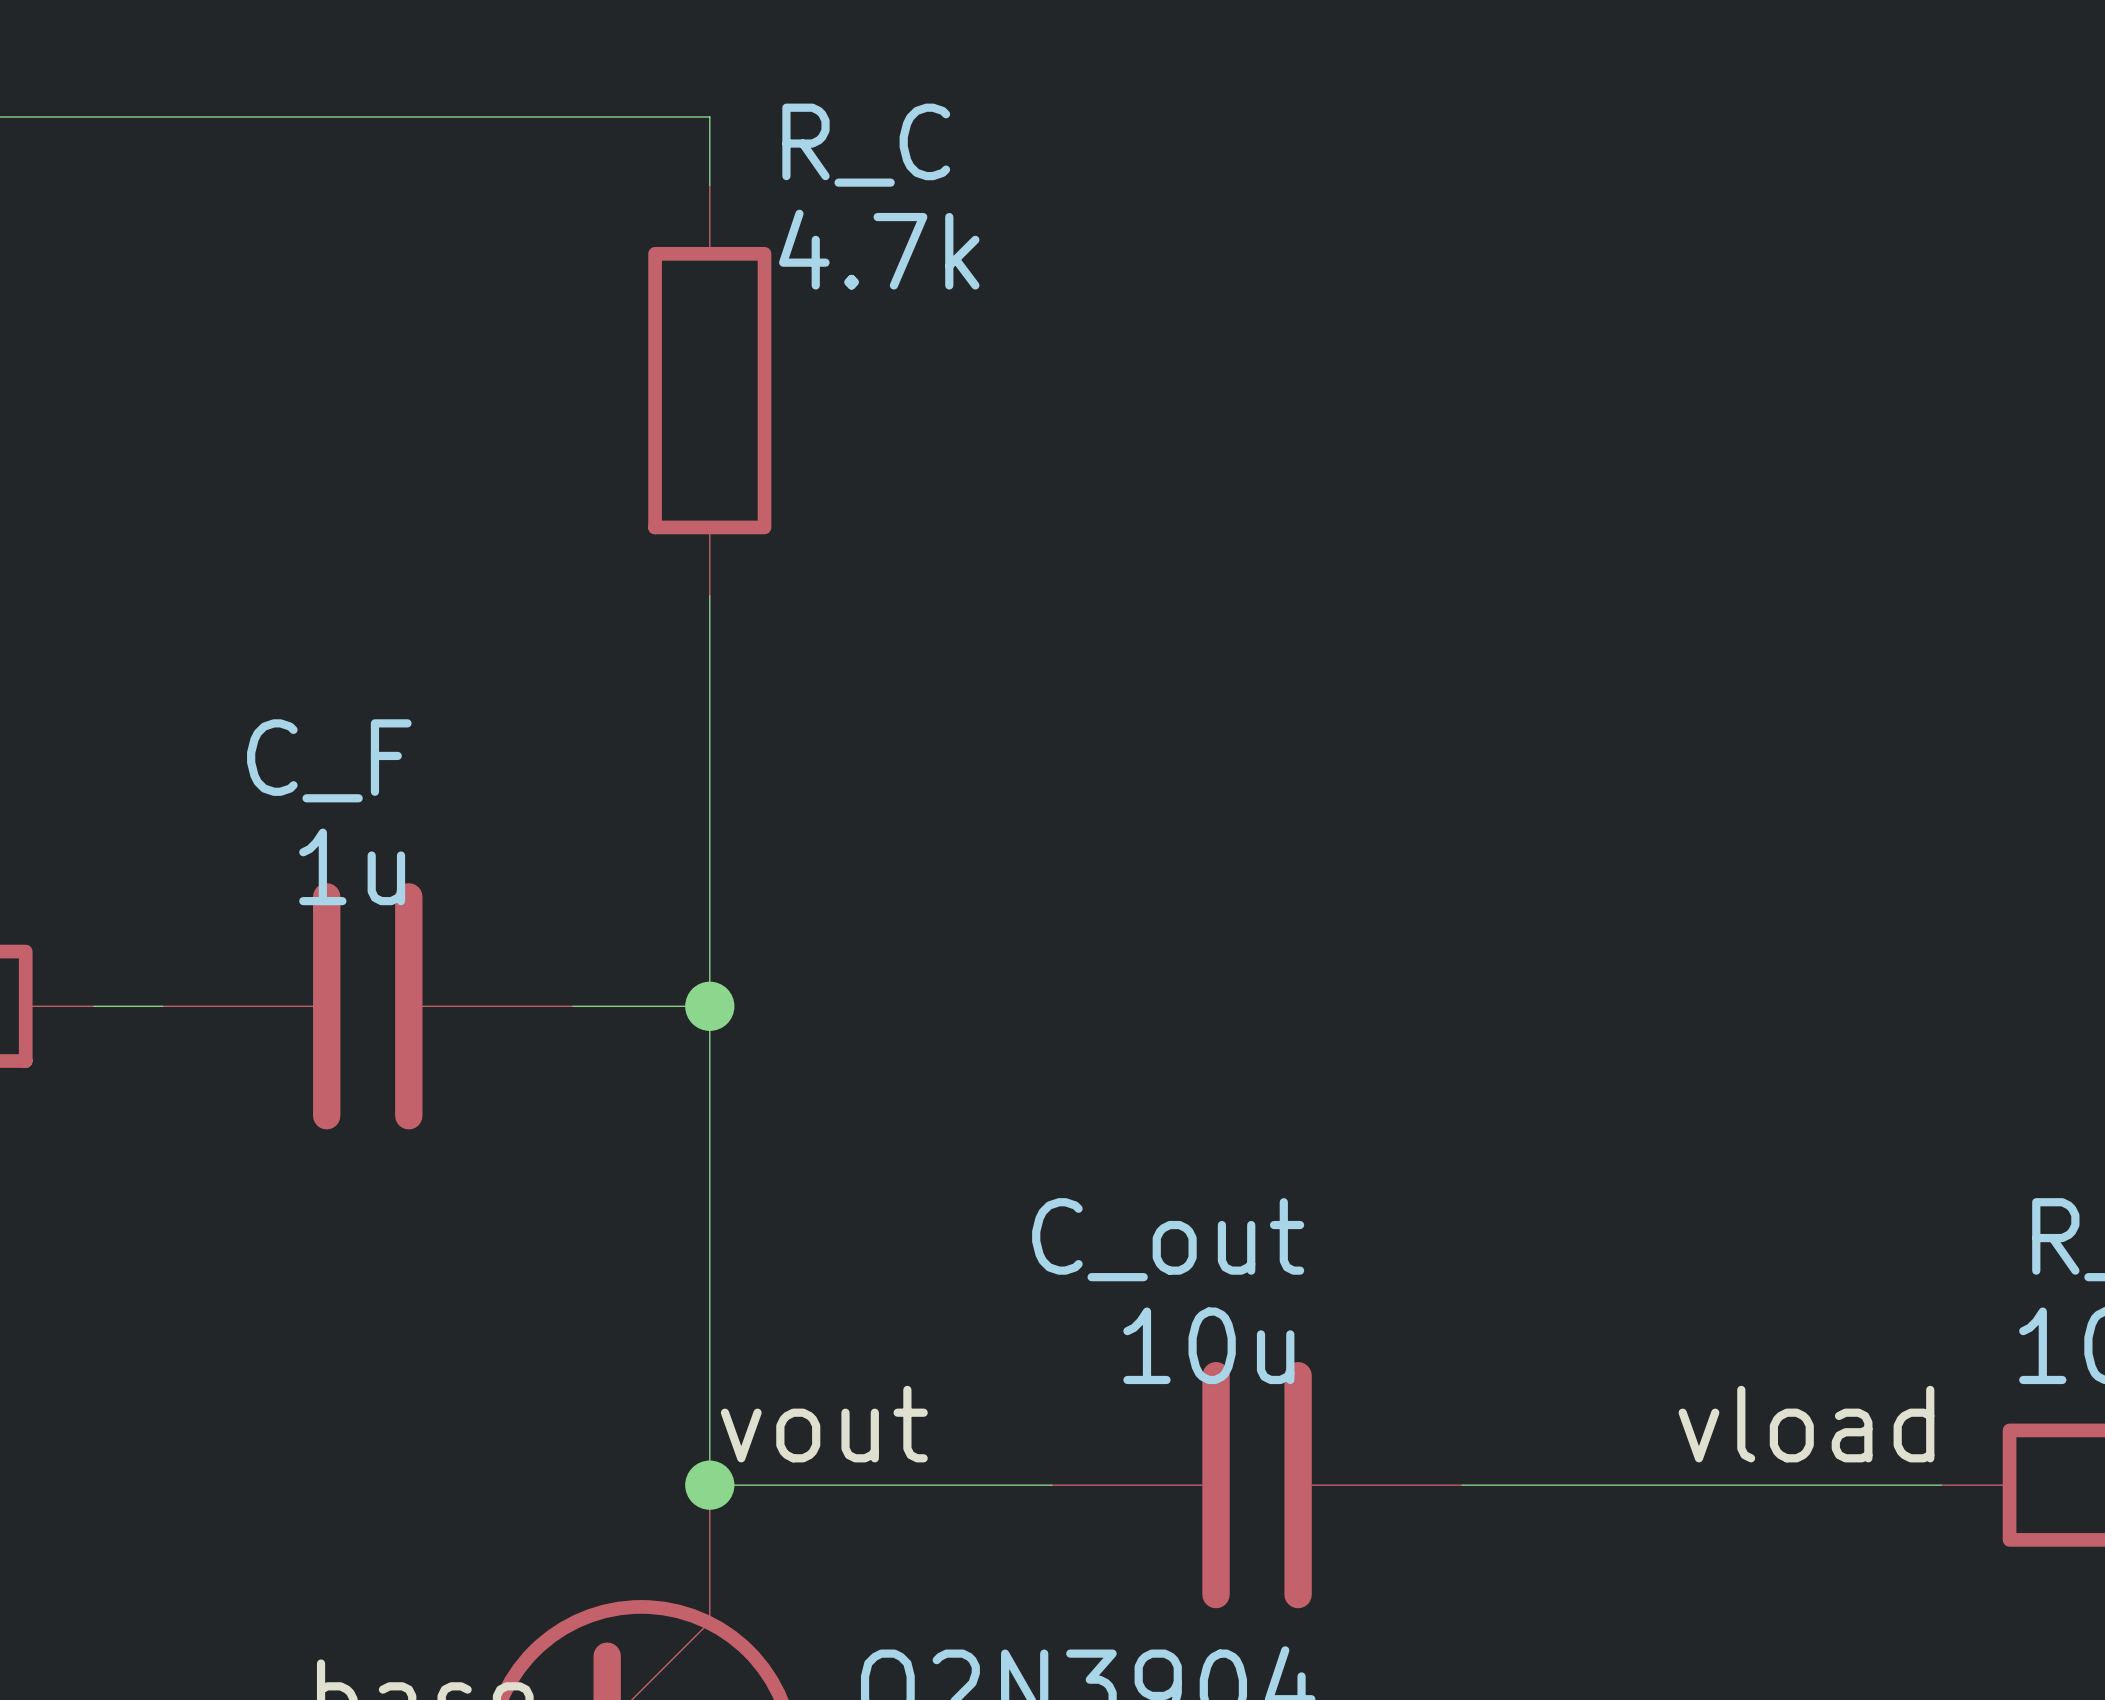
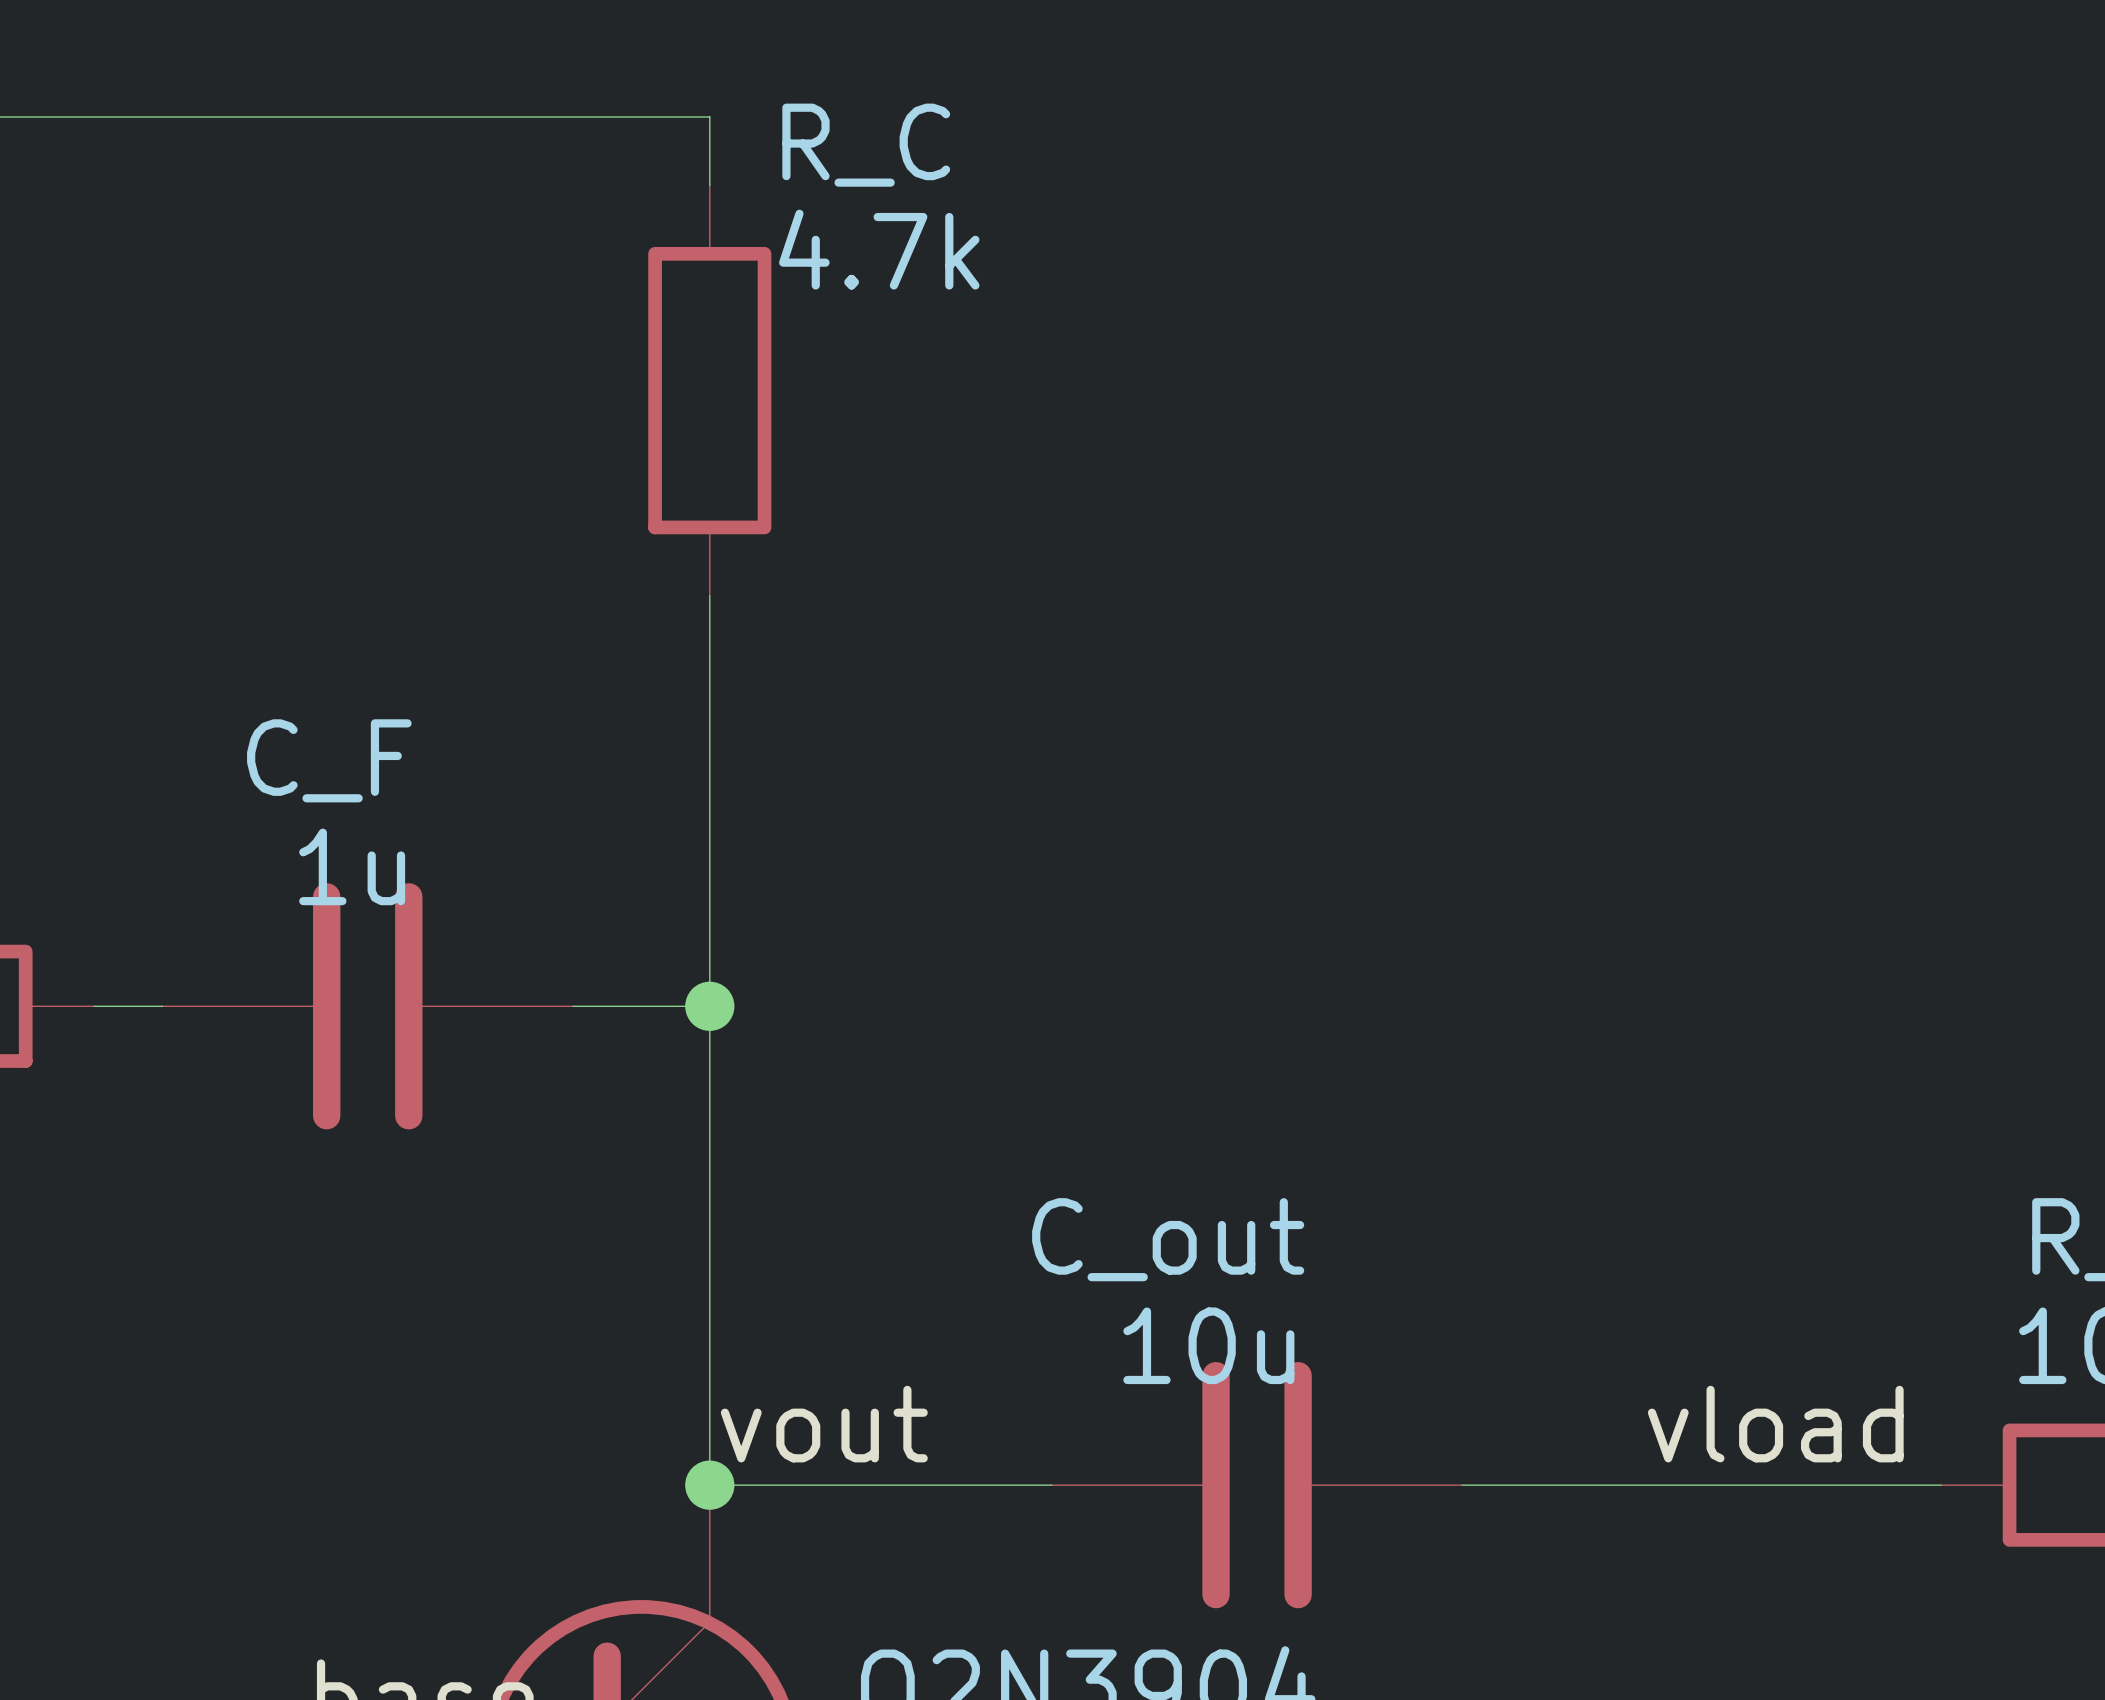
label position: vload (1806, 1424) -> vload (1775, 1424)

